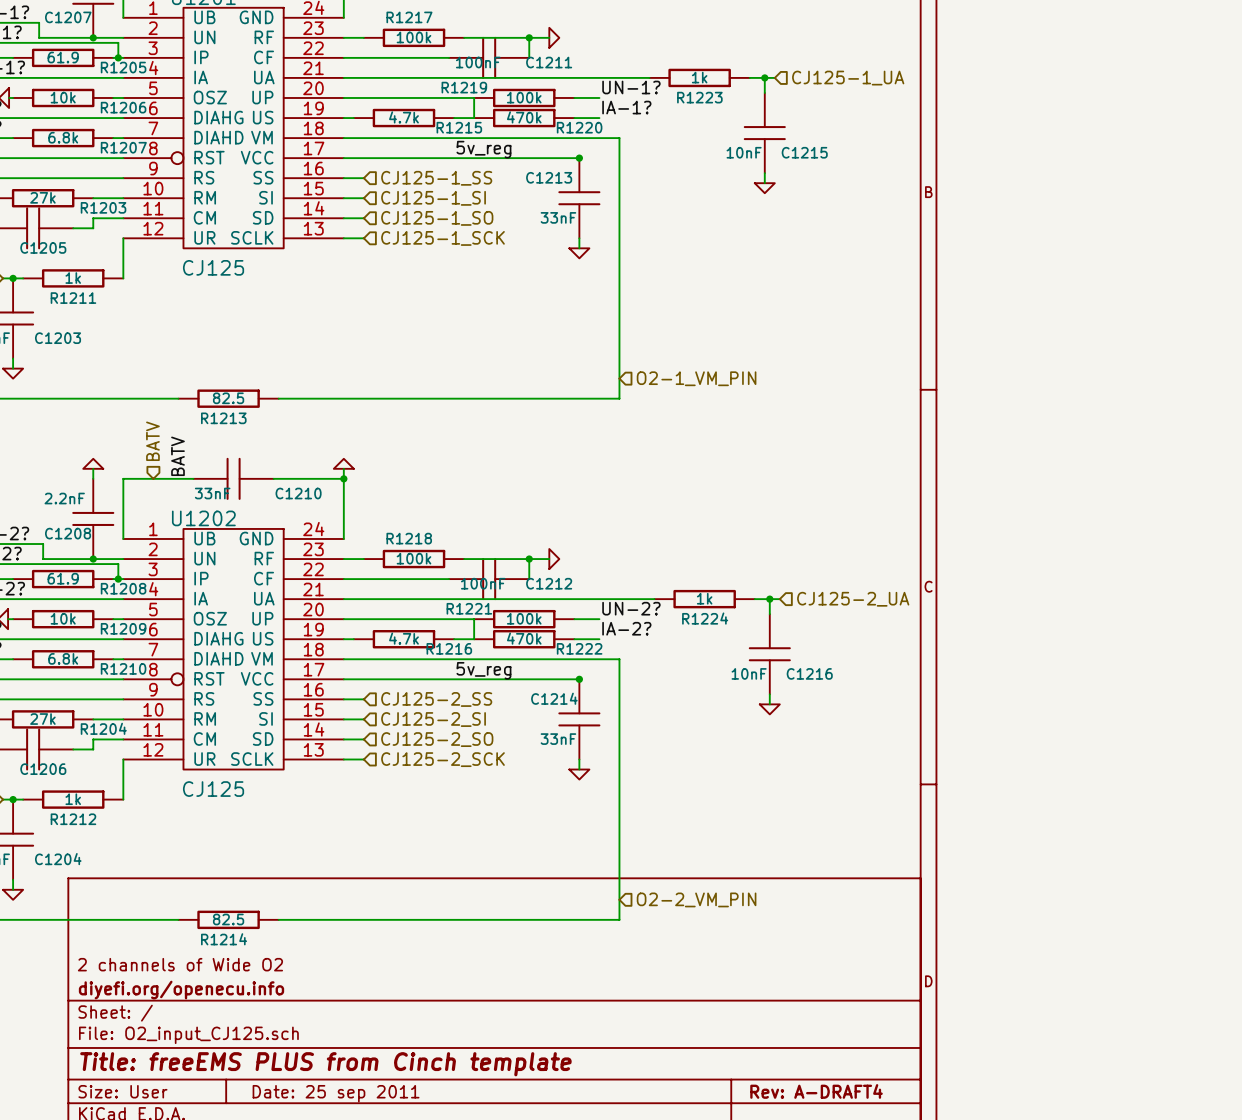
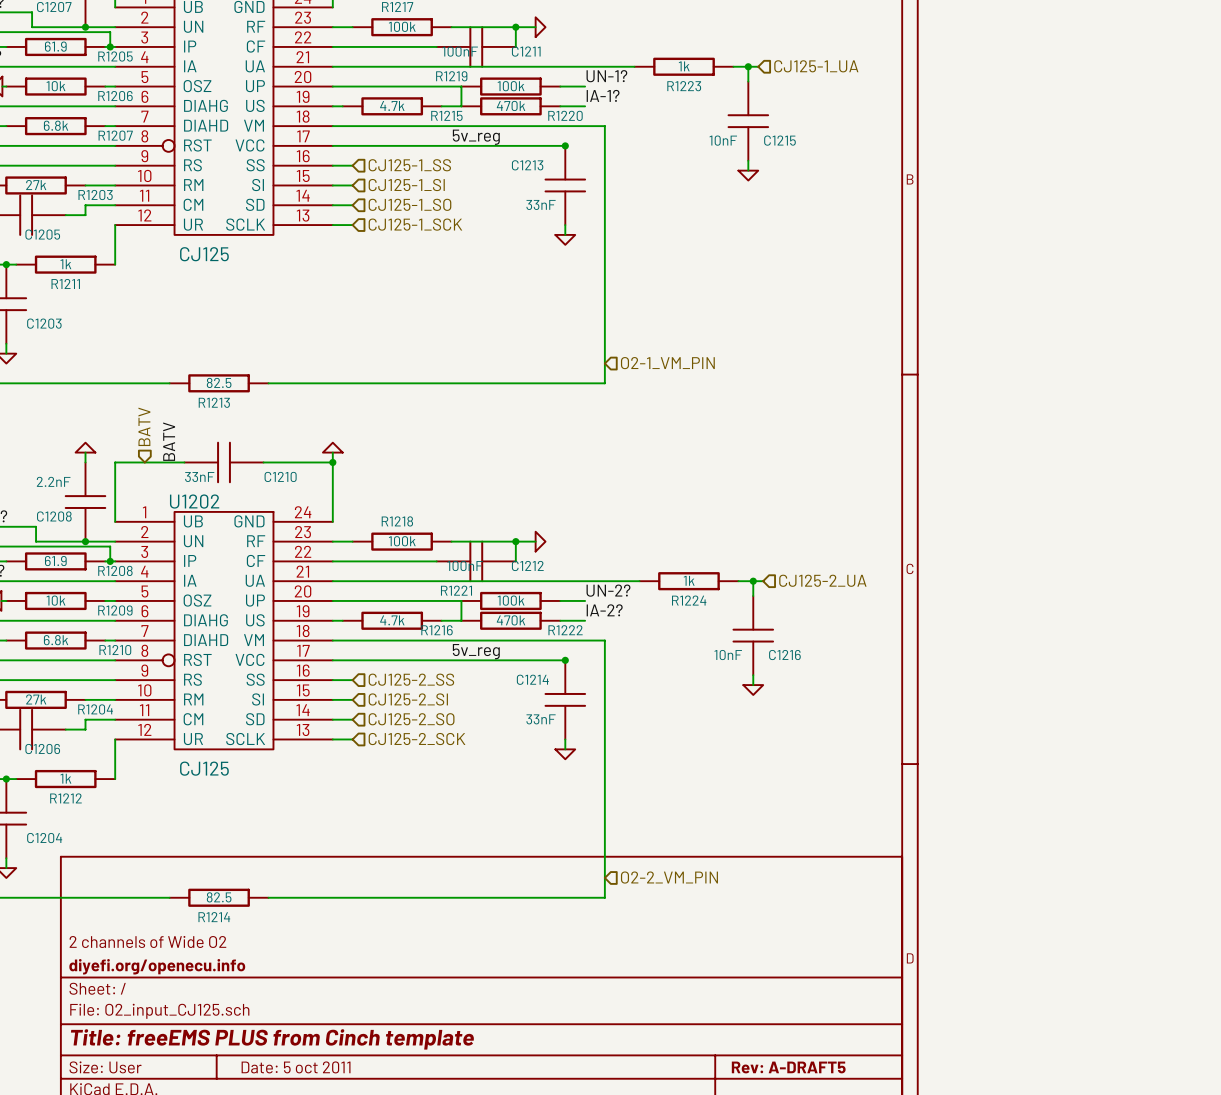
title block: Rev: A-DRAFT4 (816, 1091) -> Rev: A-DRAFT5 (788, 1067)
title block: Date: 25 sep 2011 (336, 1093) -> Date: 5 oct 2011 (296, 1067)

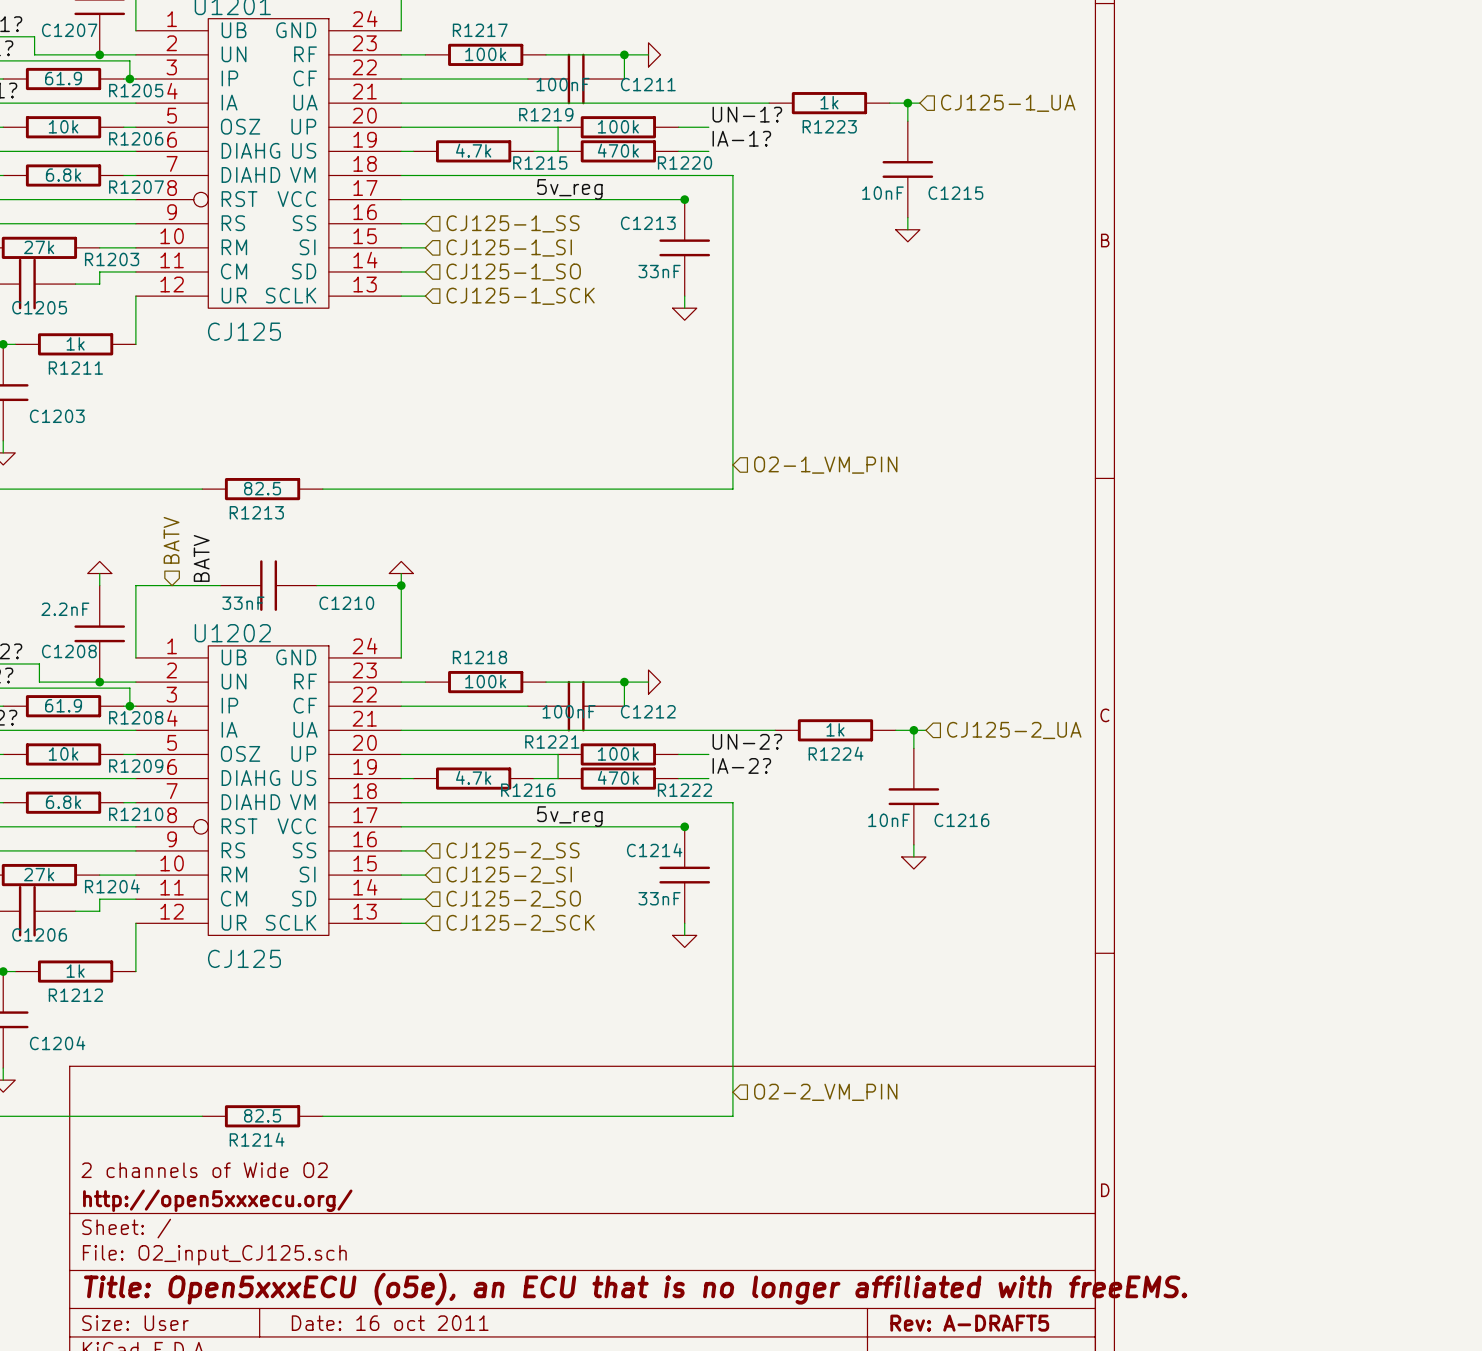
title block: diyefi.org/openecu.info (157, 966) -> http://open5xxxecu.org/ (217, 1200)
title block: Title: freeEMS PLUS from Cinch template (272, 1039) -> Title: Open5xxxECU (o5e), an ECU that is no longer affiliated with freeEMS. (635, 1289)
title block: Date: 5 oct 2011 (296, 1067) -> Date: 16 oct 2011 (390, 1323)

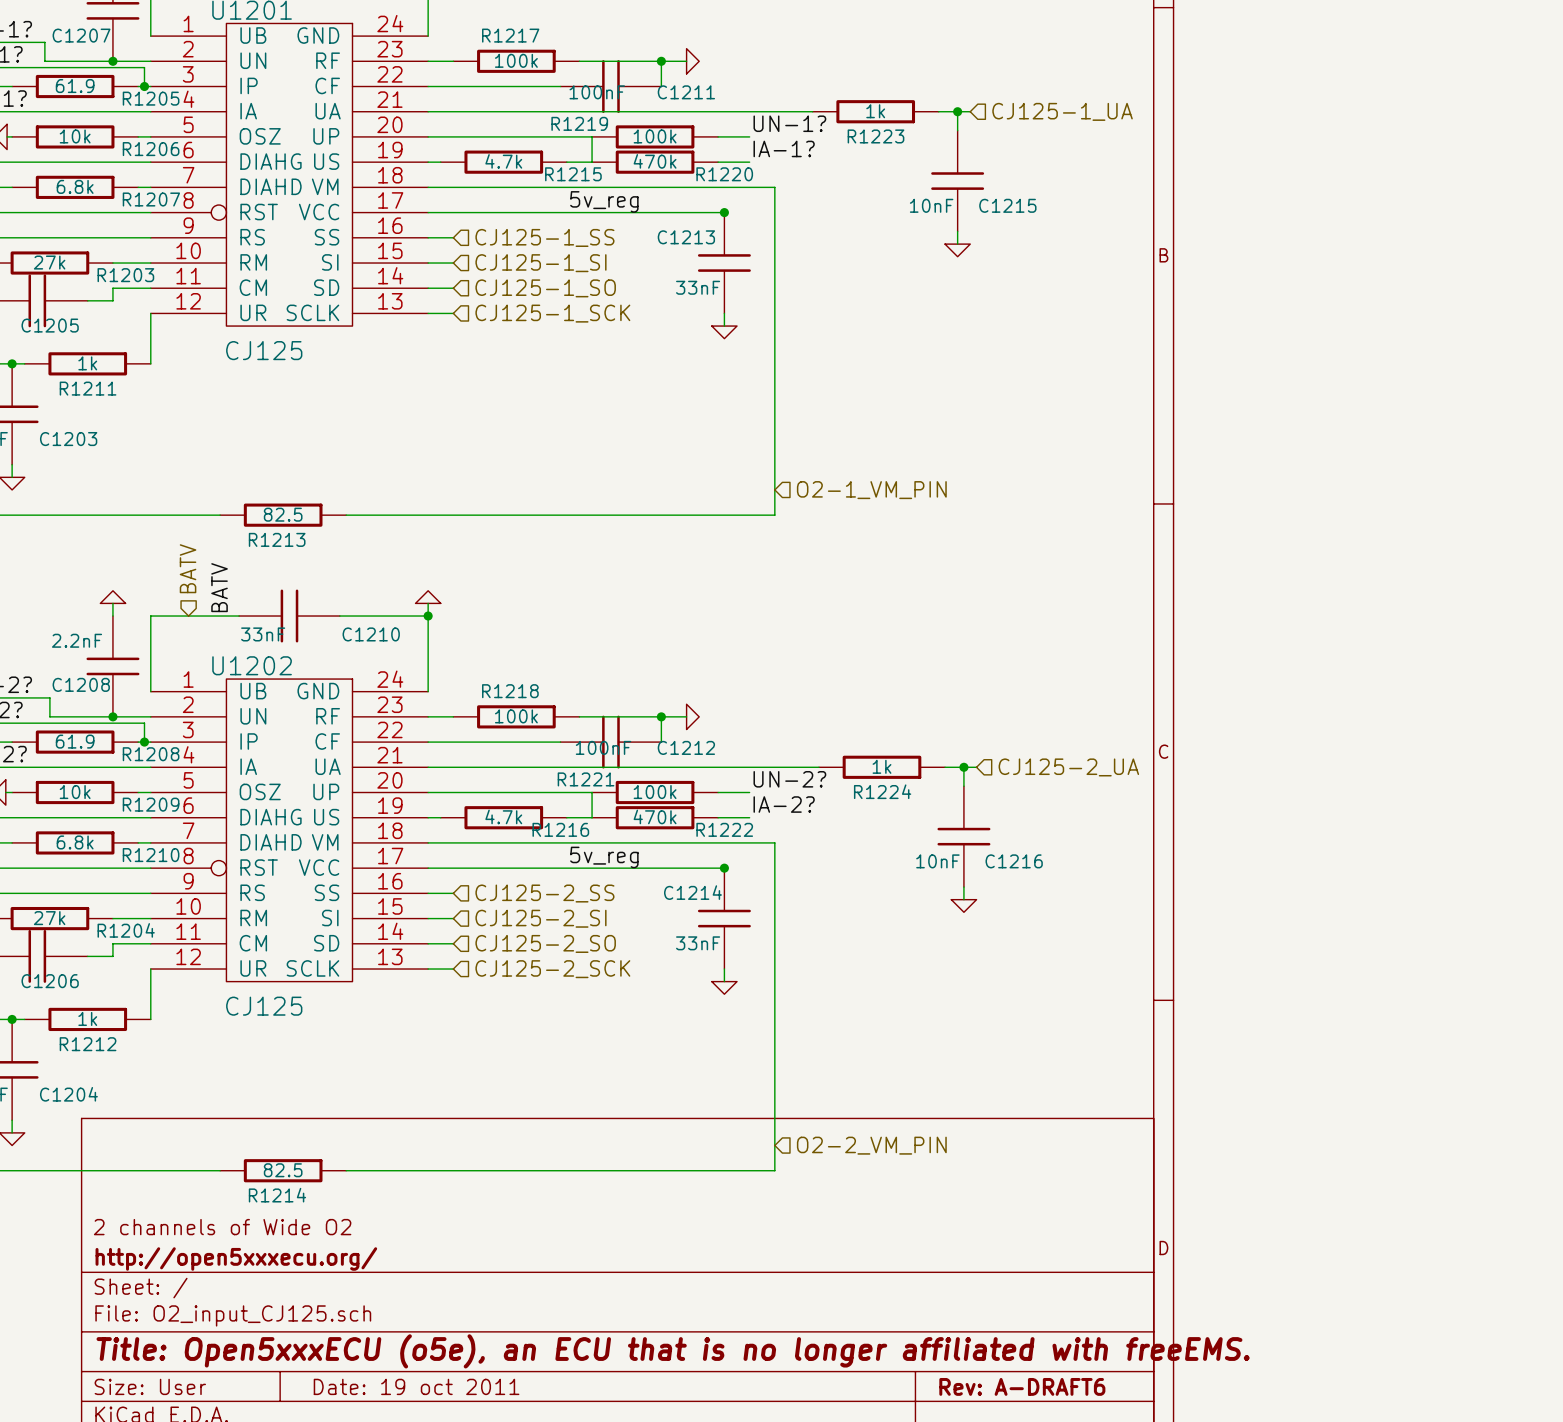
title block: Date: 16 oct 2011 (390, 1323) -> Date: 19 oct 2011 (416, 1386)
title block: Rev: A-DRAFT5 (969, 1323) -> Rev: A-DRAFT6 (1022, 1386)

